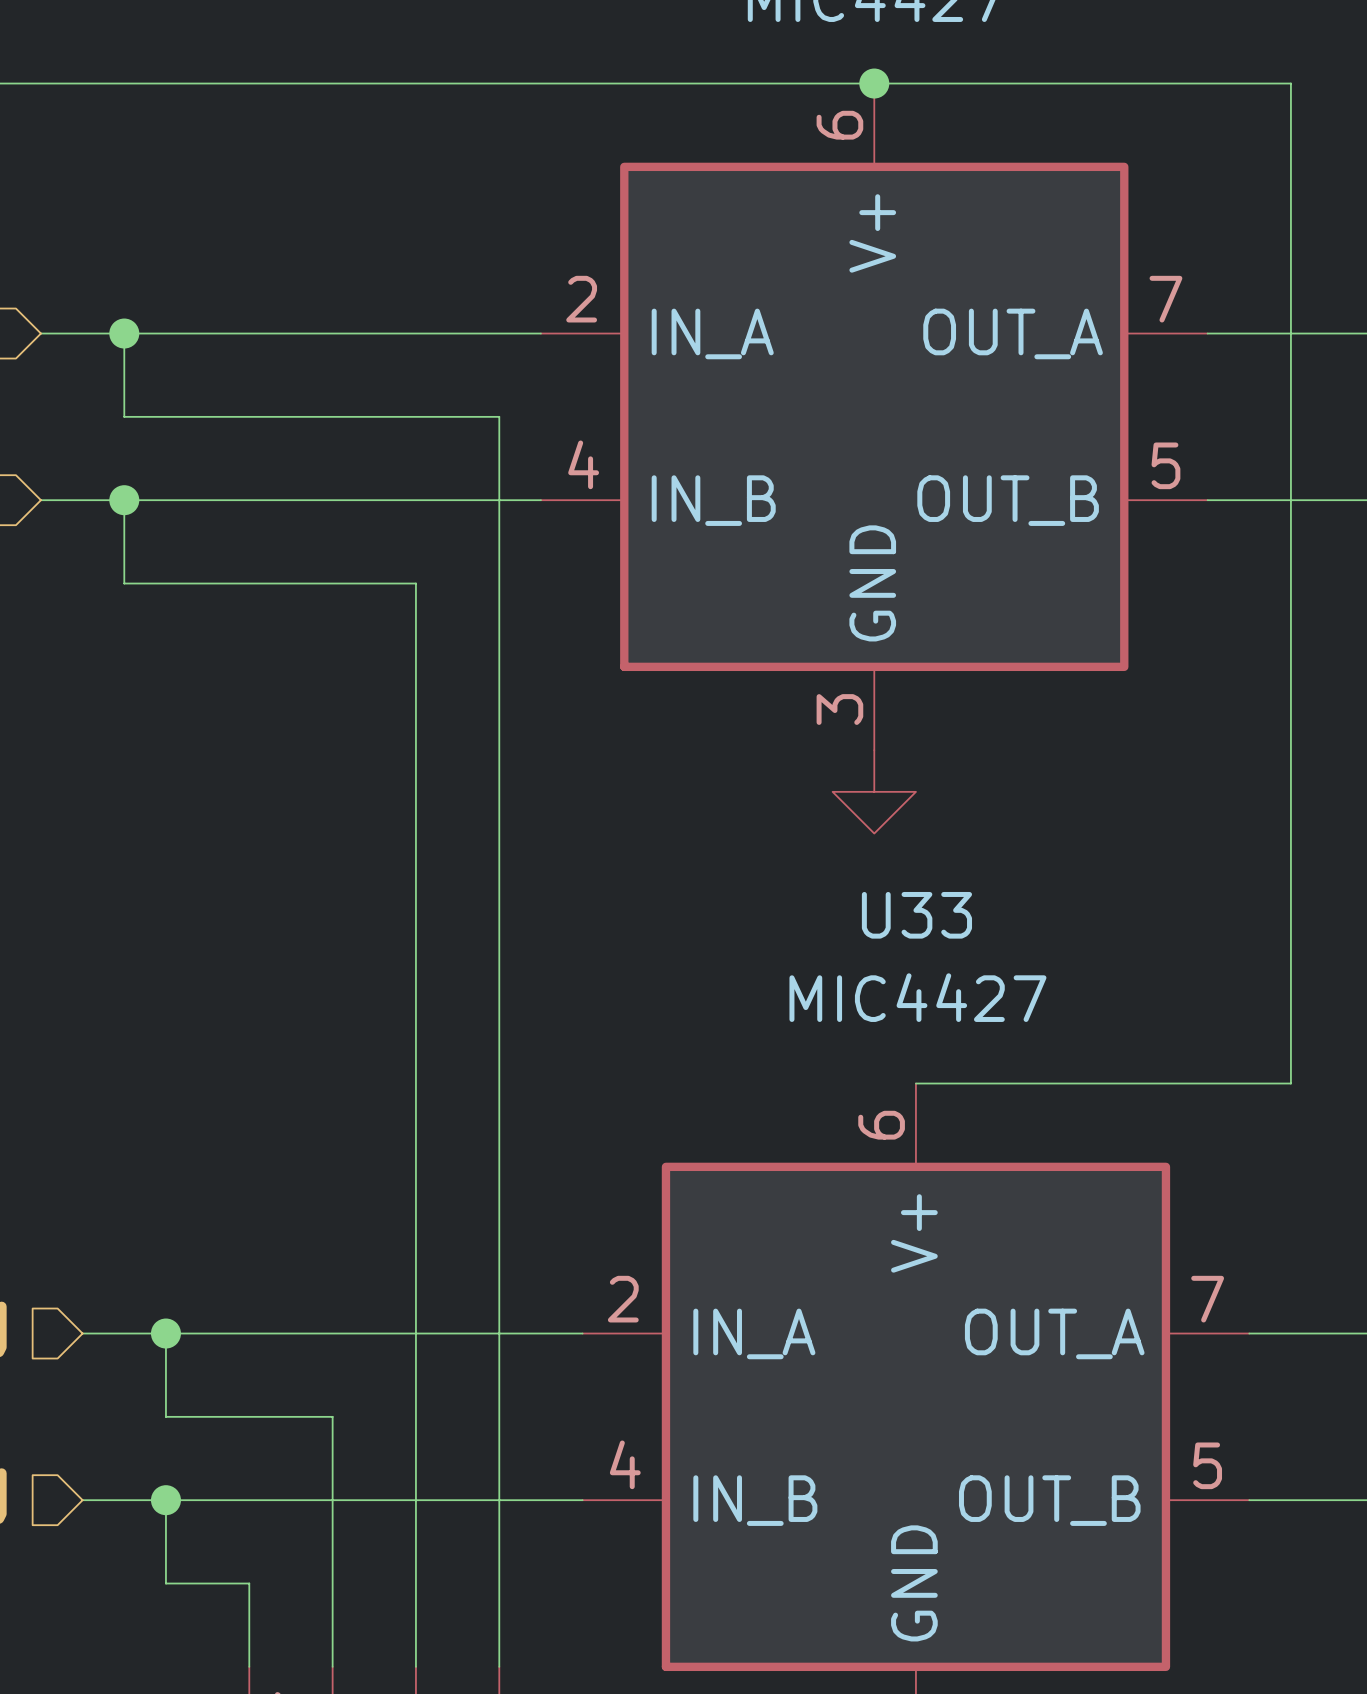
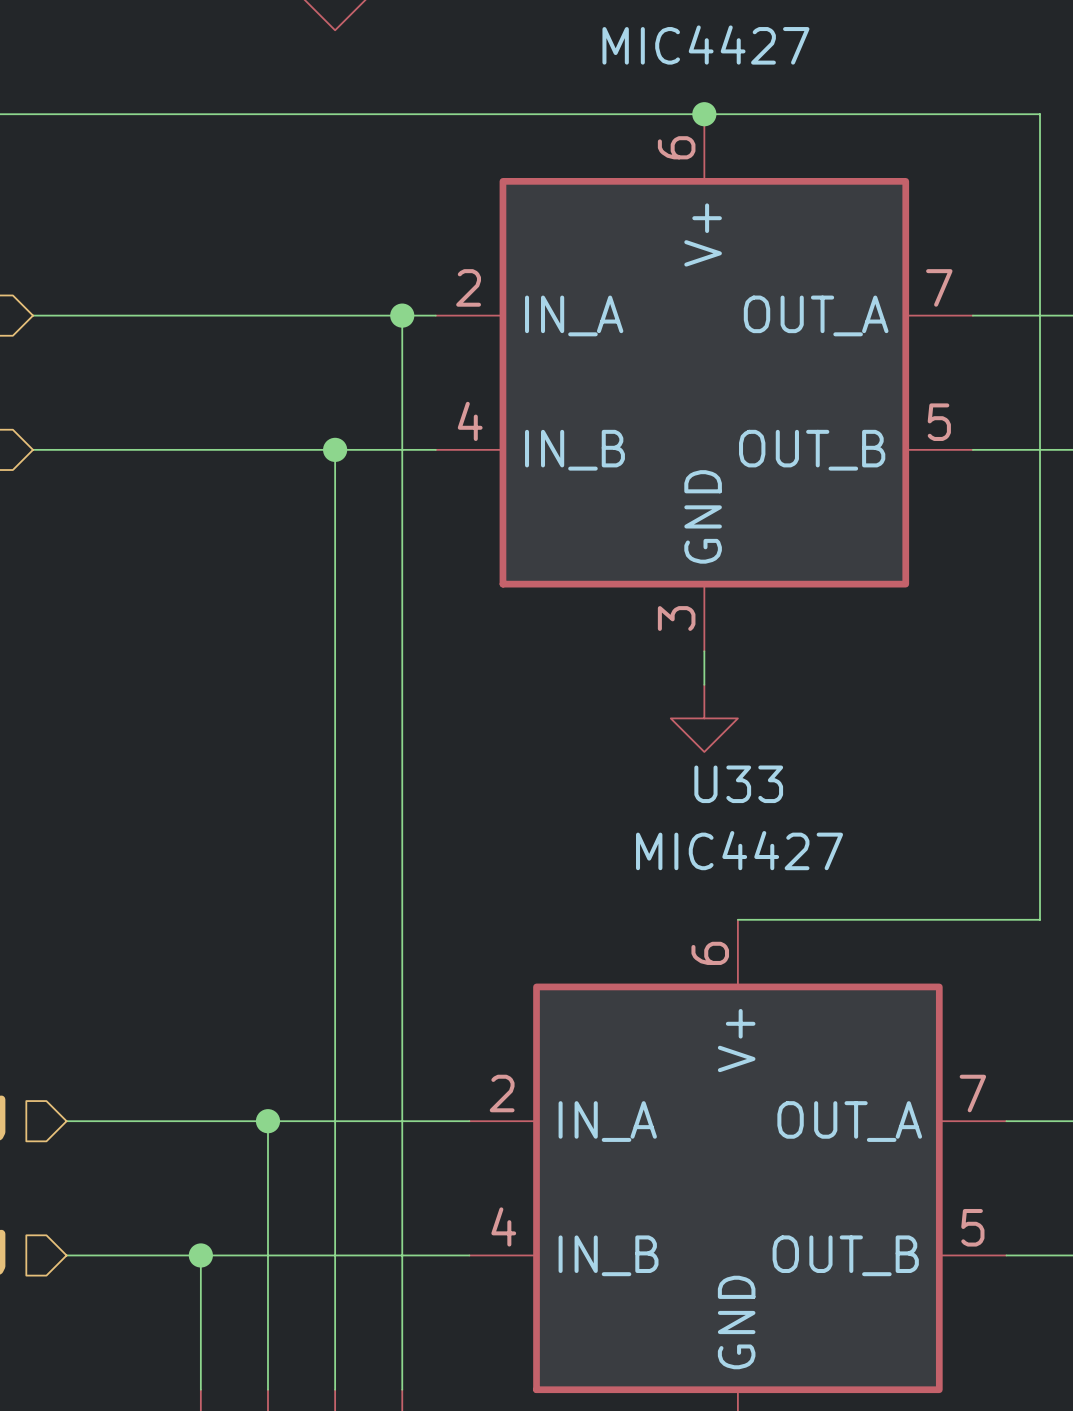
wire: (124, 333) (124, 416) (499, 416) -> (402, 315) (402, 382)
junction: (124, 333) -> none
junction: none -> (402, 315)
wire: (124, 500) (124, 583) (415, 583) -> (335, 449) (335, 517)
junction: (124, 500) -> none
junction: none -> (335, 449)
power symbol position: (874, 791) -> (704, 718)
wire: (165, 1333) (165, 1416) (332, 1416) -> (267, 1121) (267, 1188)
junction: (165, 1333) -> none
junction: none -> (267, 1121)
wire: (165, 1500) (165, 1583) (249, 1583) -> (200, 1255) (200, 1322)
junction position: (165, 1500) -> (200, 1255)

